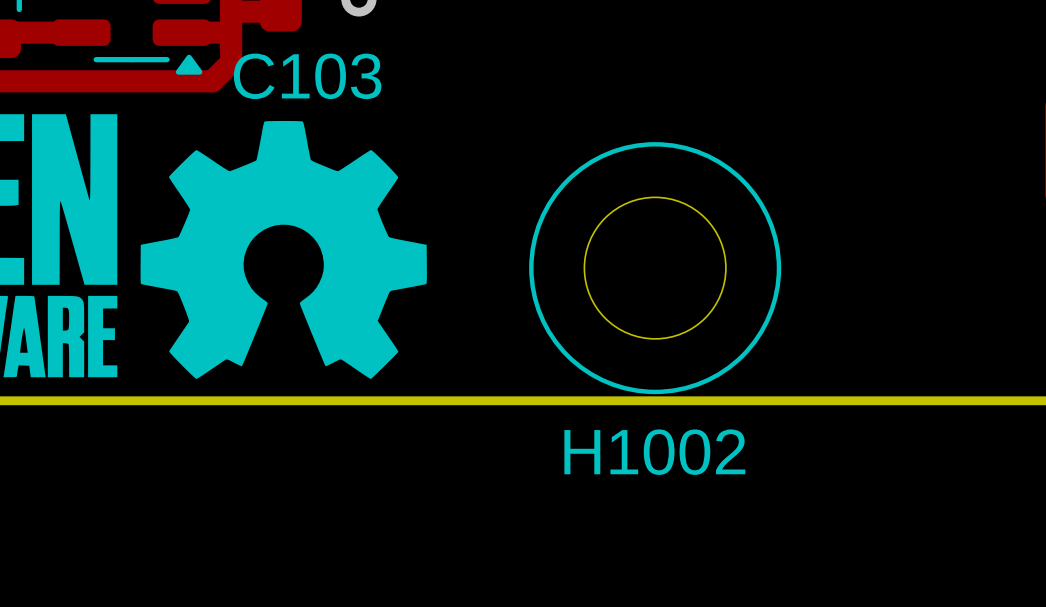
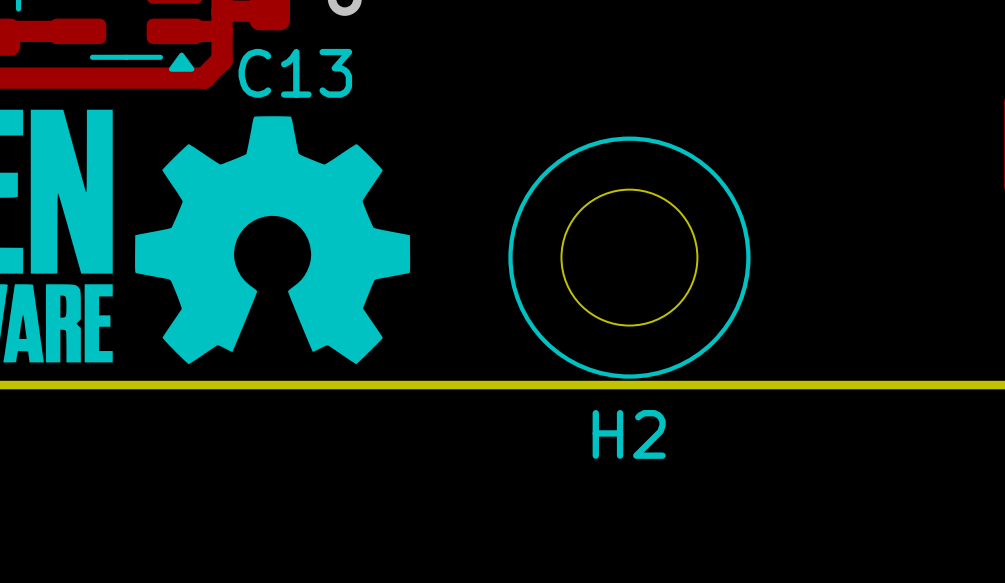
C103 name: C103 (307, 76) -> C13 (295, 73)
H1002 name: H1002 (654, 452) -> H2 (629, 434)

